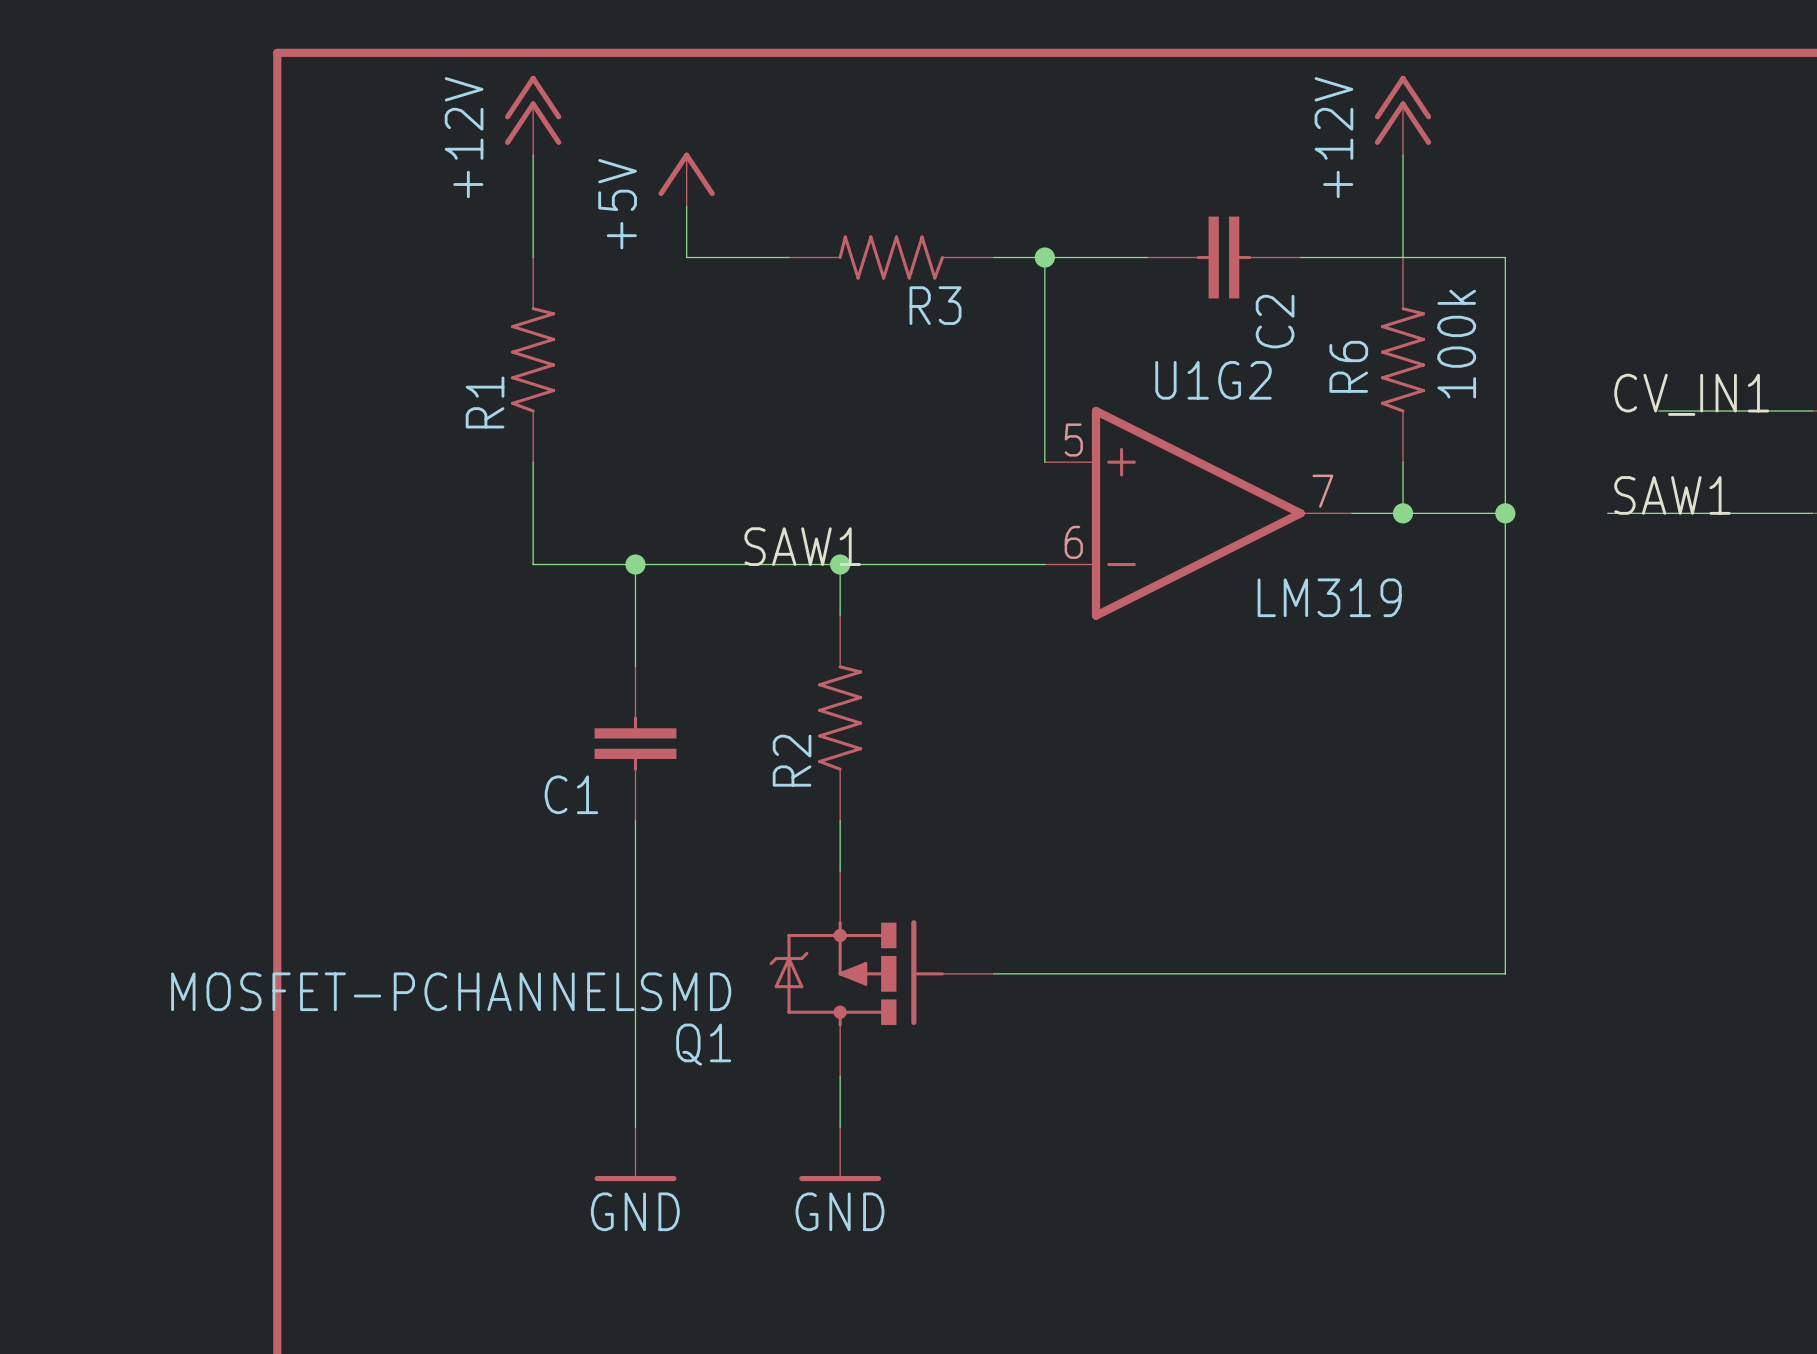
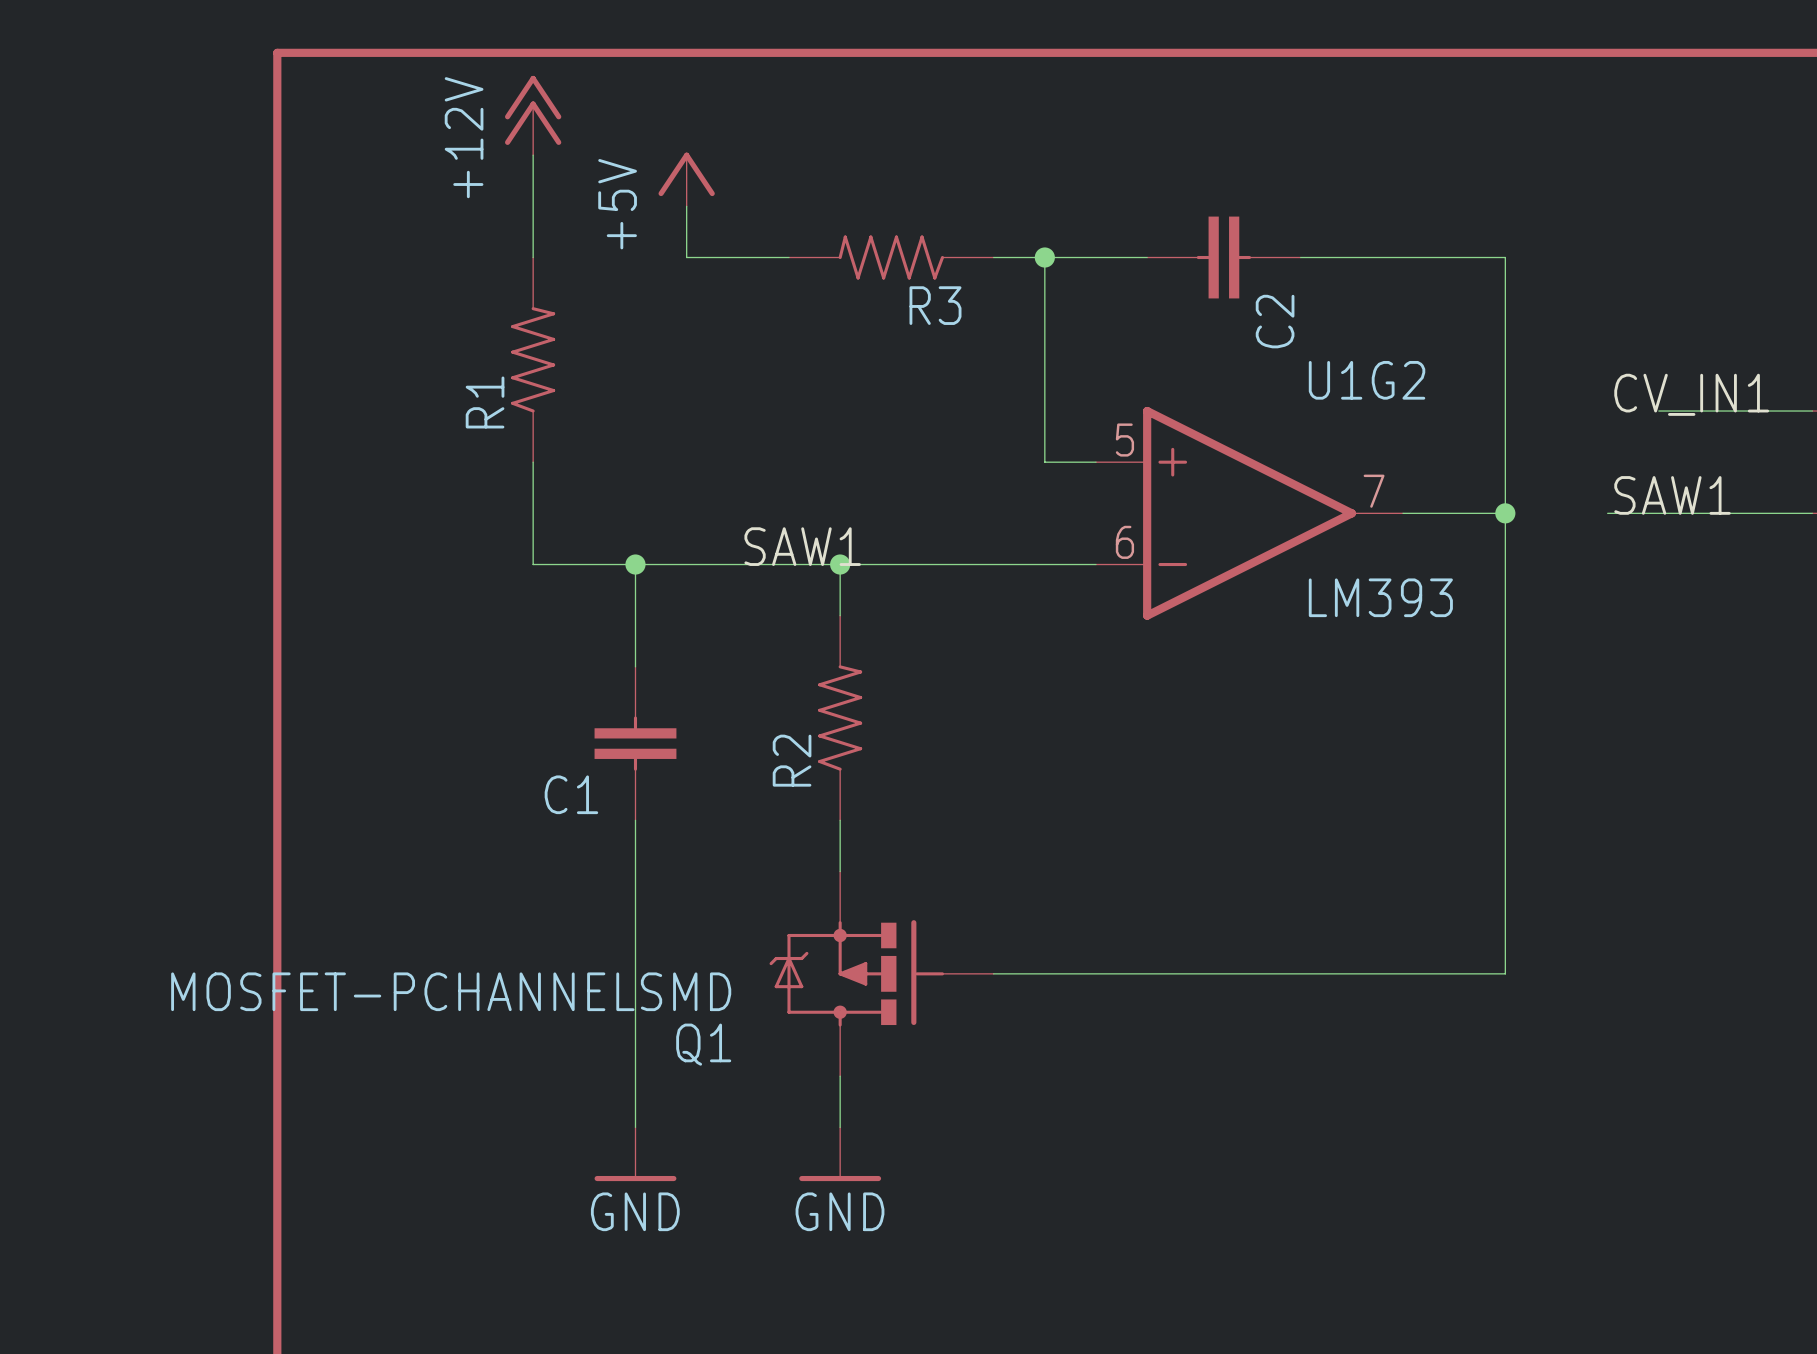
power symbol: +12V (1403, 115) -> none
wire: (1403, 155) (1403, 257) -> none
R6: 100k (1403, 359) -> none
U1G2 name position: U1G2 (1213, 380) -> U1G2 (1367, 380)
wire: (1403, 462) (1403, 513) (1351, 513) -> none
U1G2 position: (1198, 513) -> (1249, 513)
junction: (1403, 513) -> none
U1G2 value: LM319 (1329, 597) -> LM393 (1380, 597)

